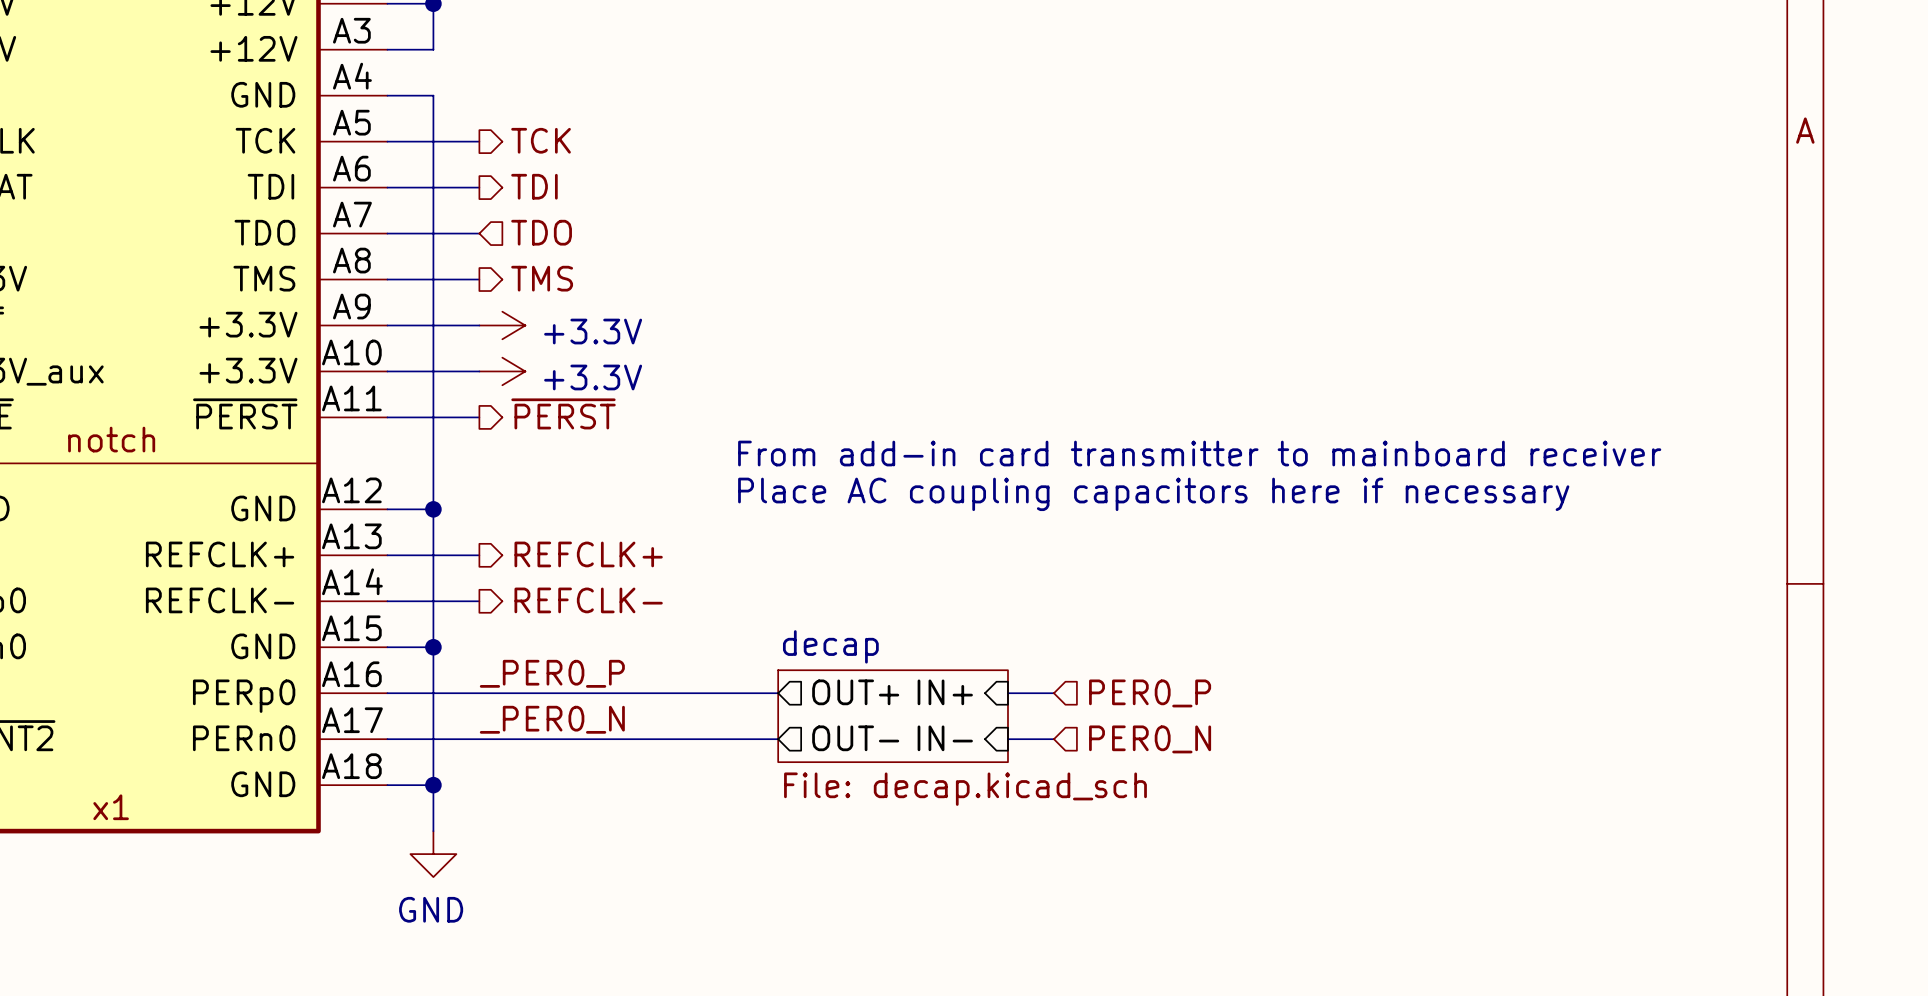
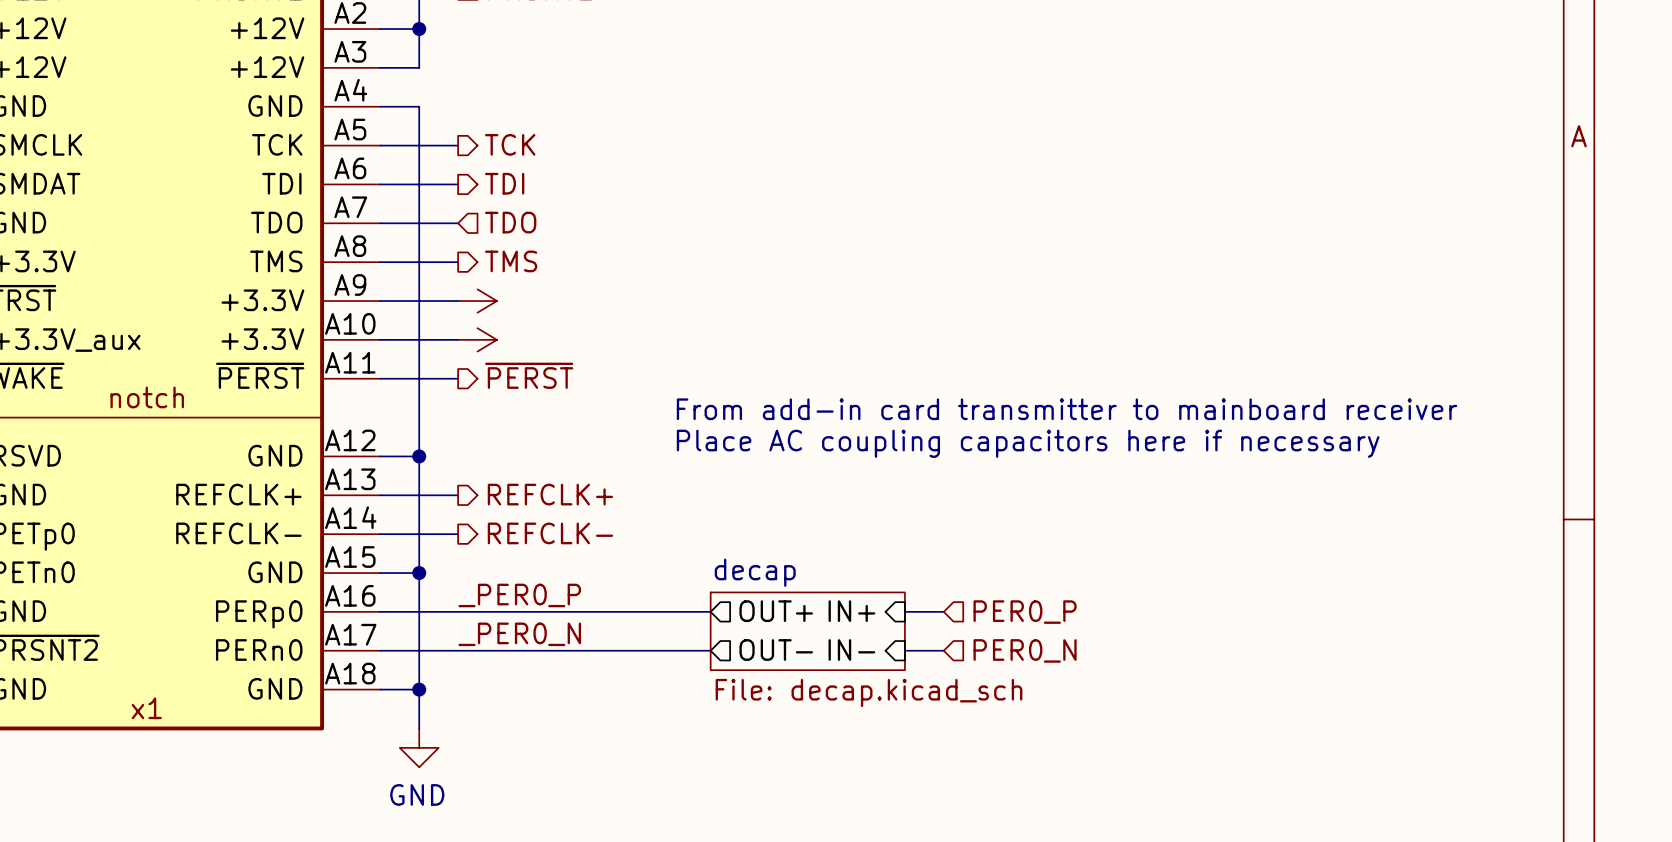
power symbol text: +3.3V (593, 331) -> none
power symbol text: +3.3V (593, 377) -> none

